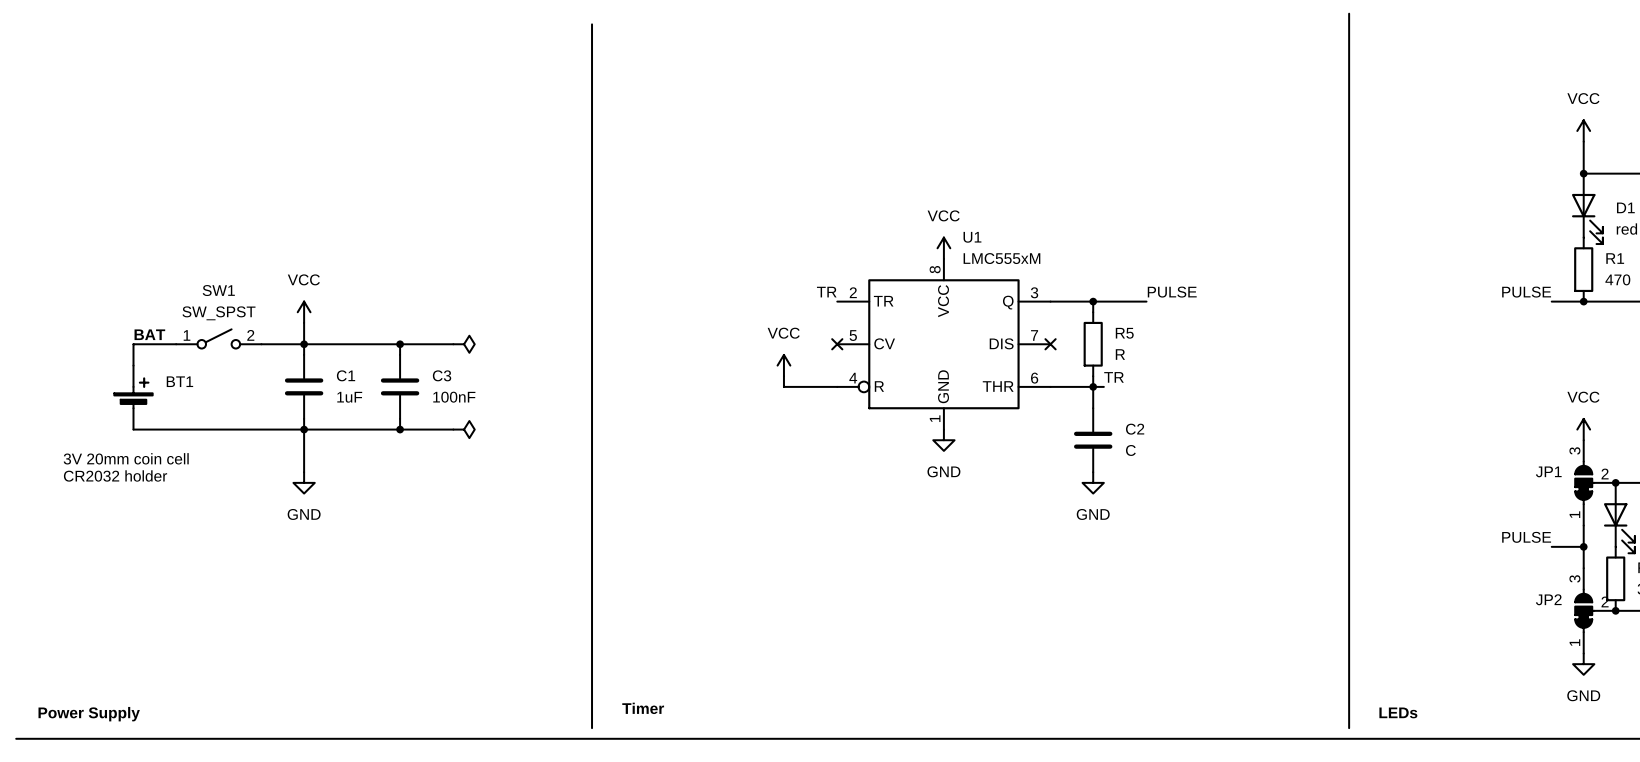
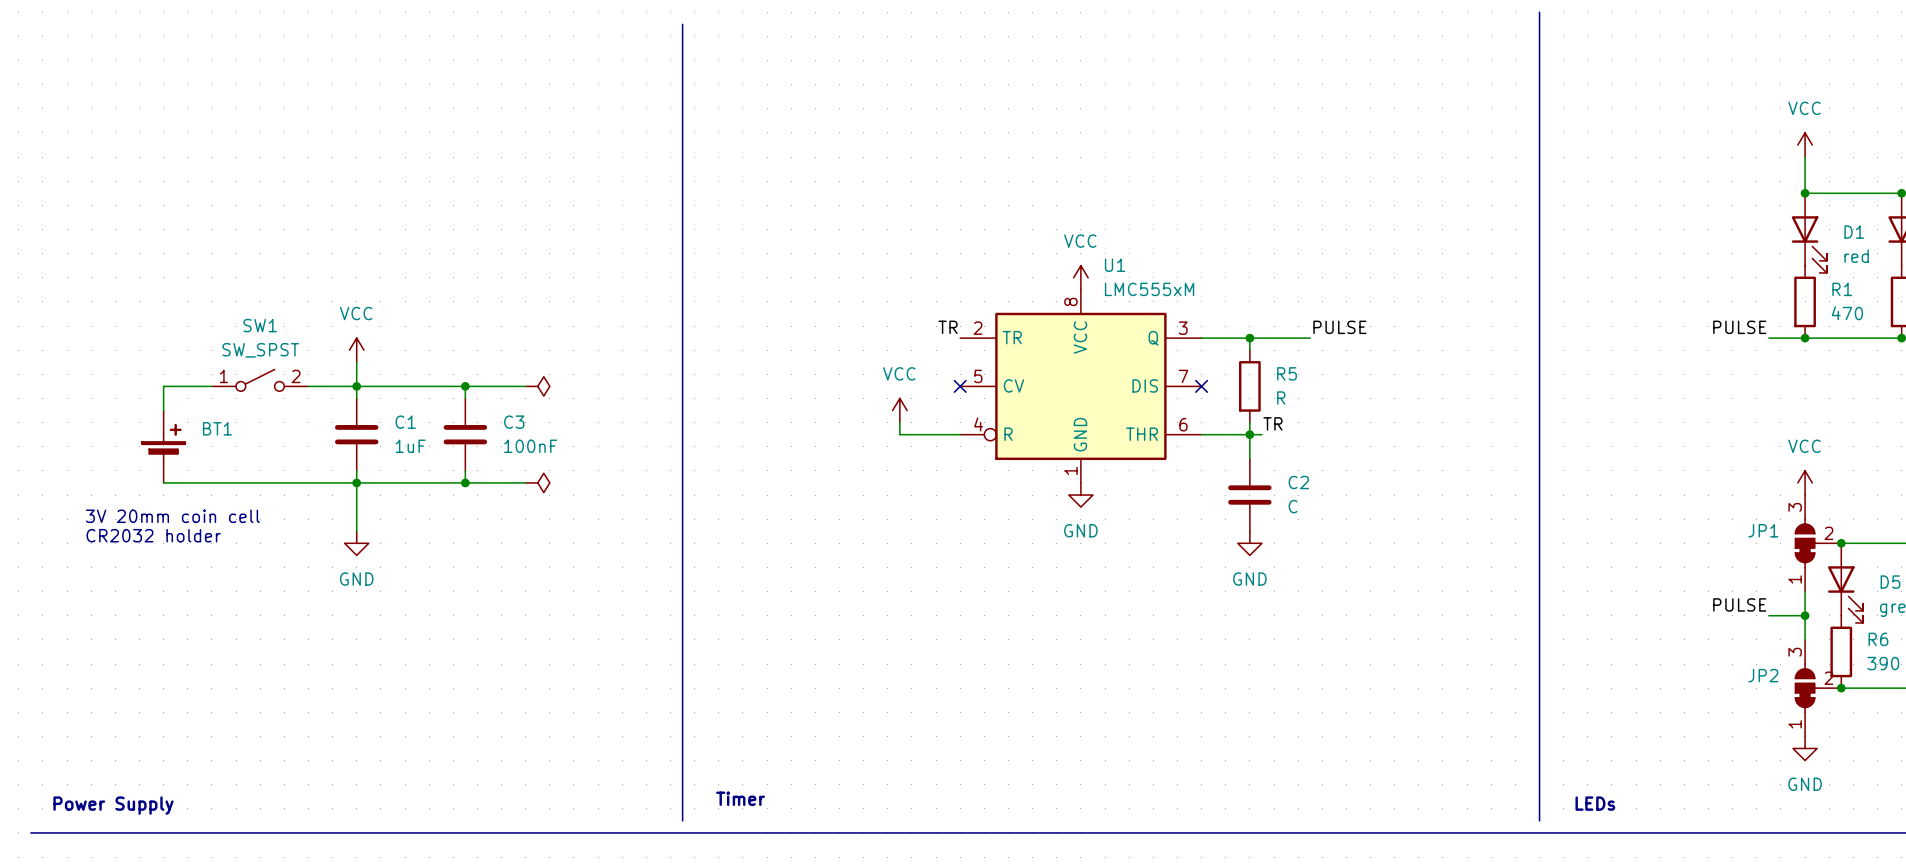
label: BAT (149, 334) -> none

